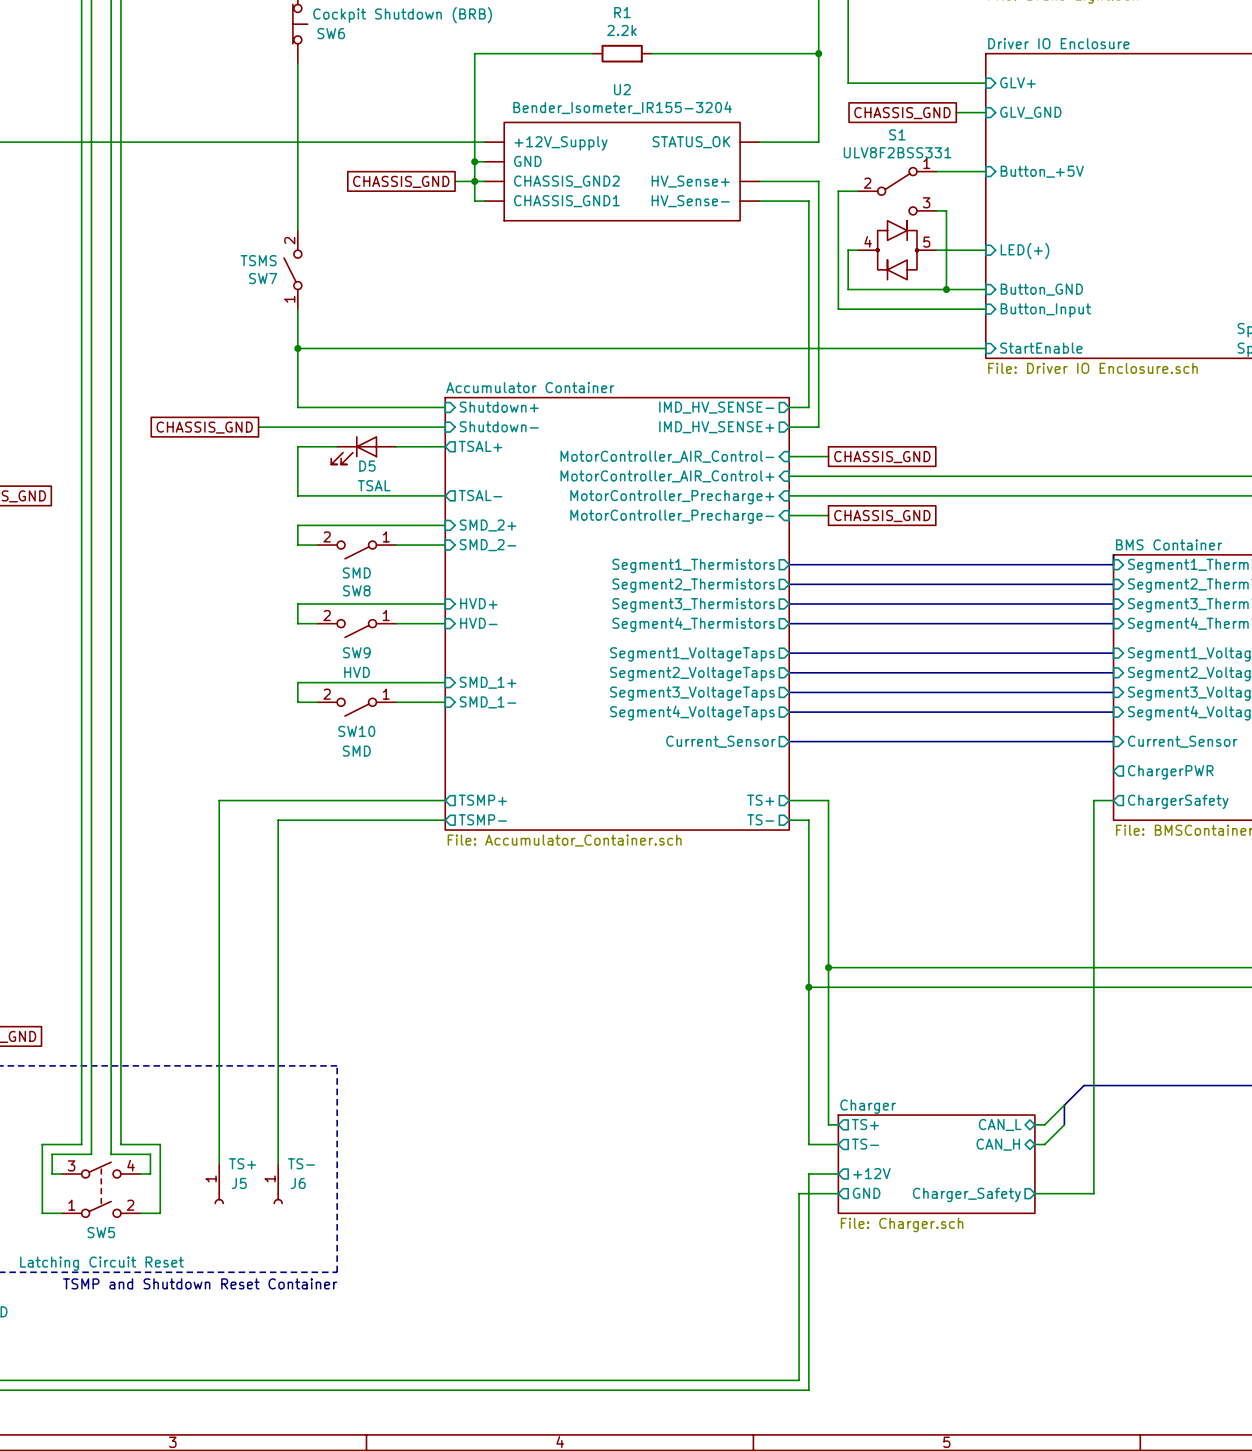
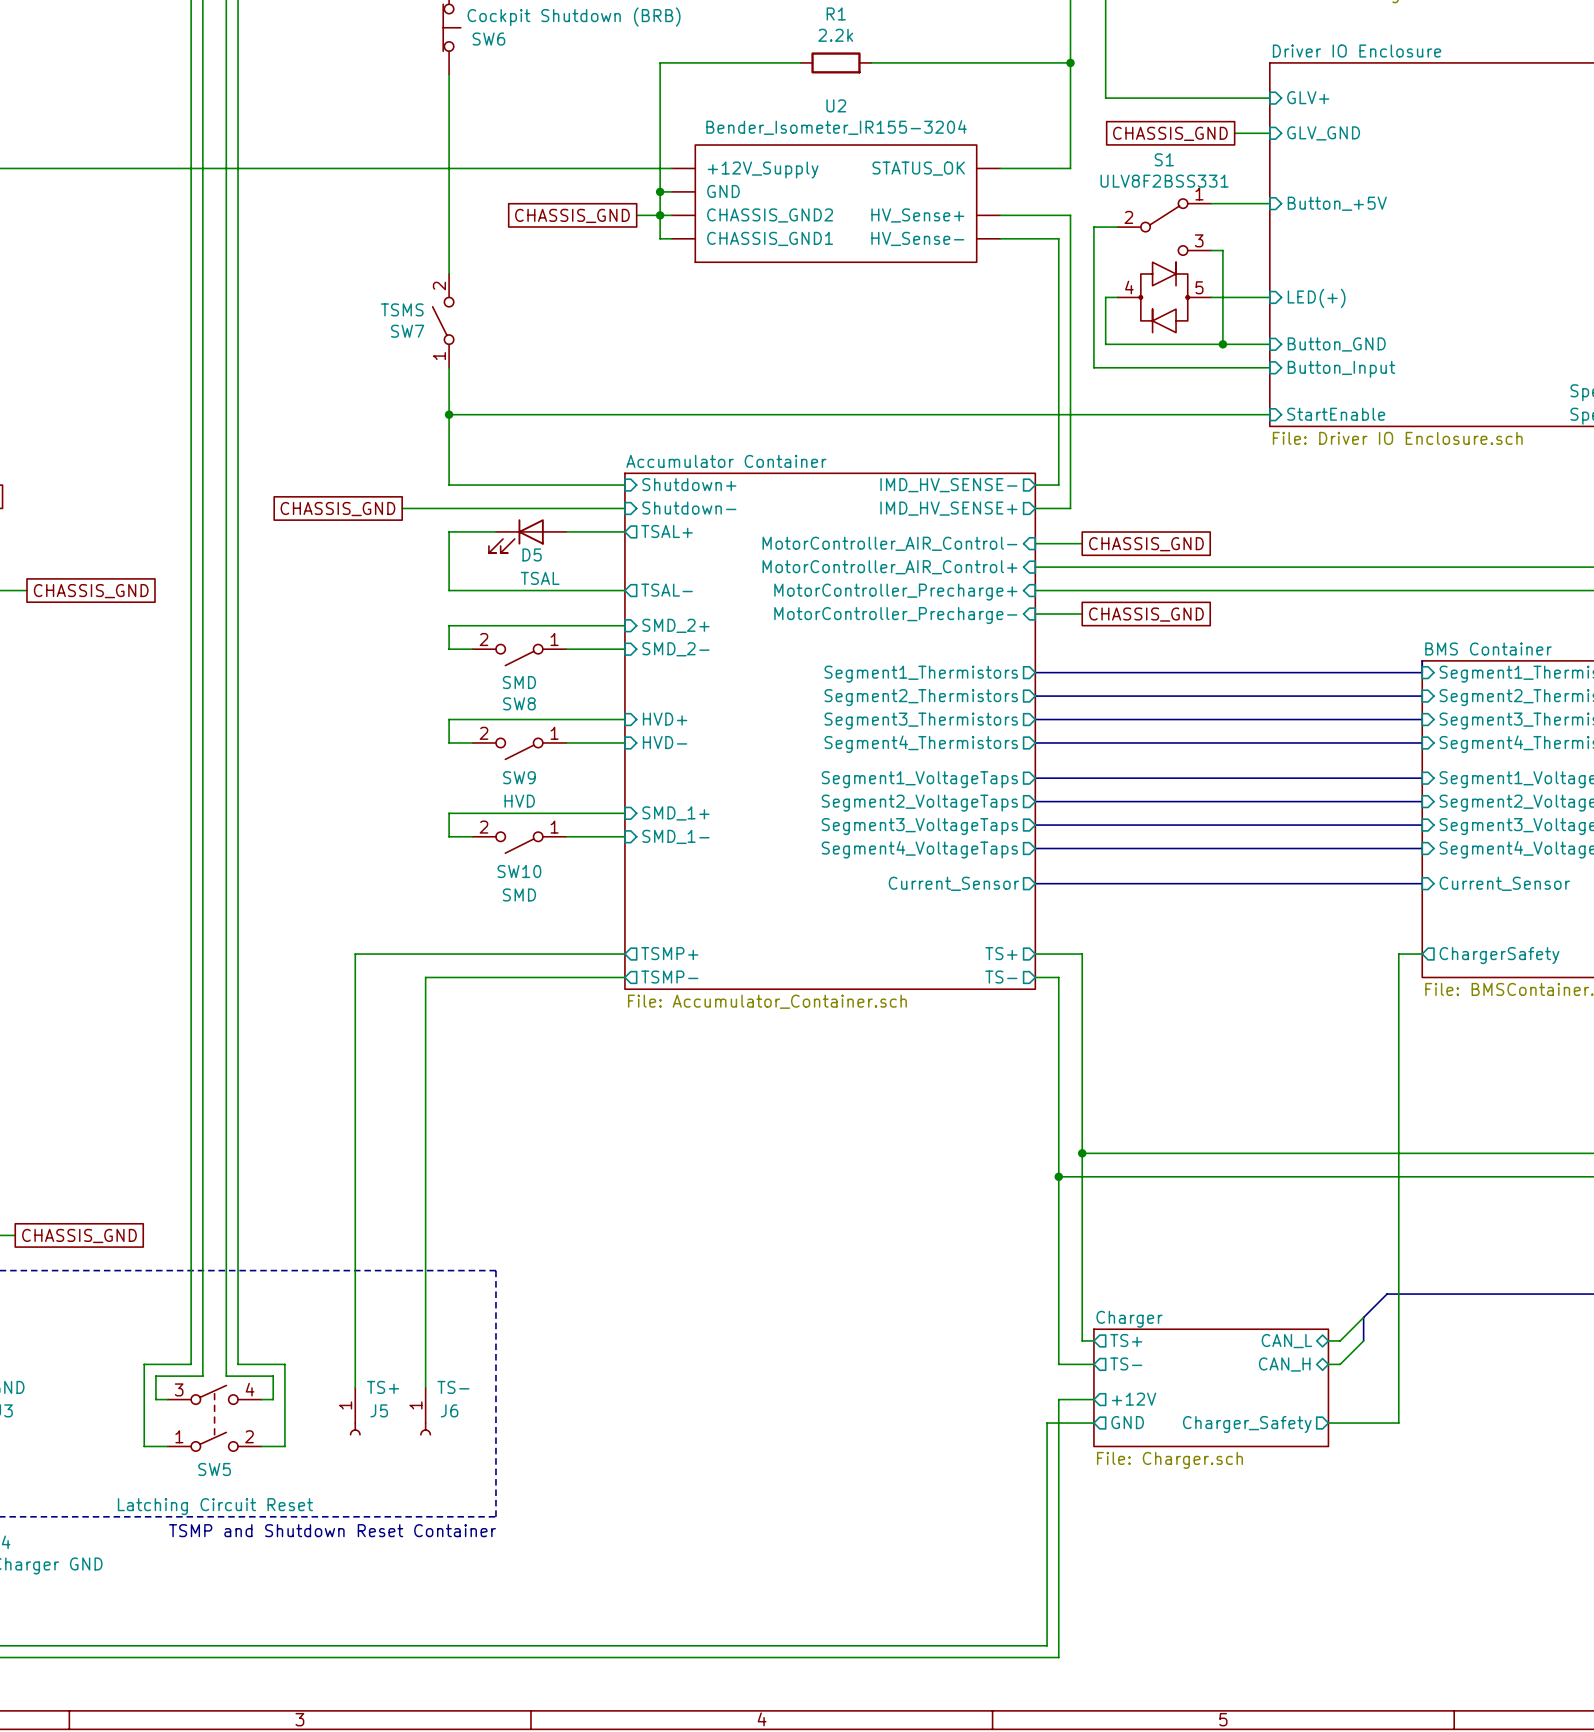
sheet pin: ChargerPWR (1170, 772) -> none

